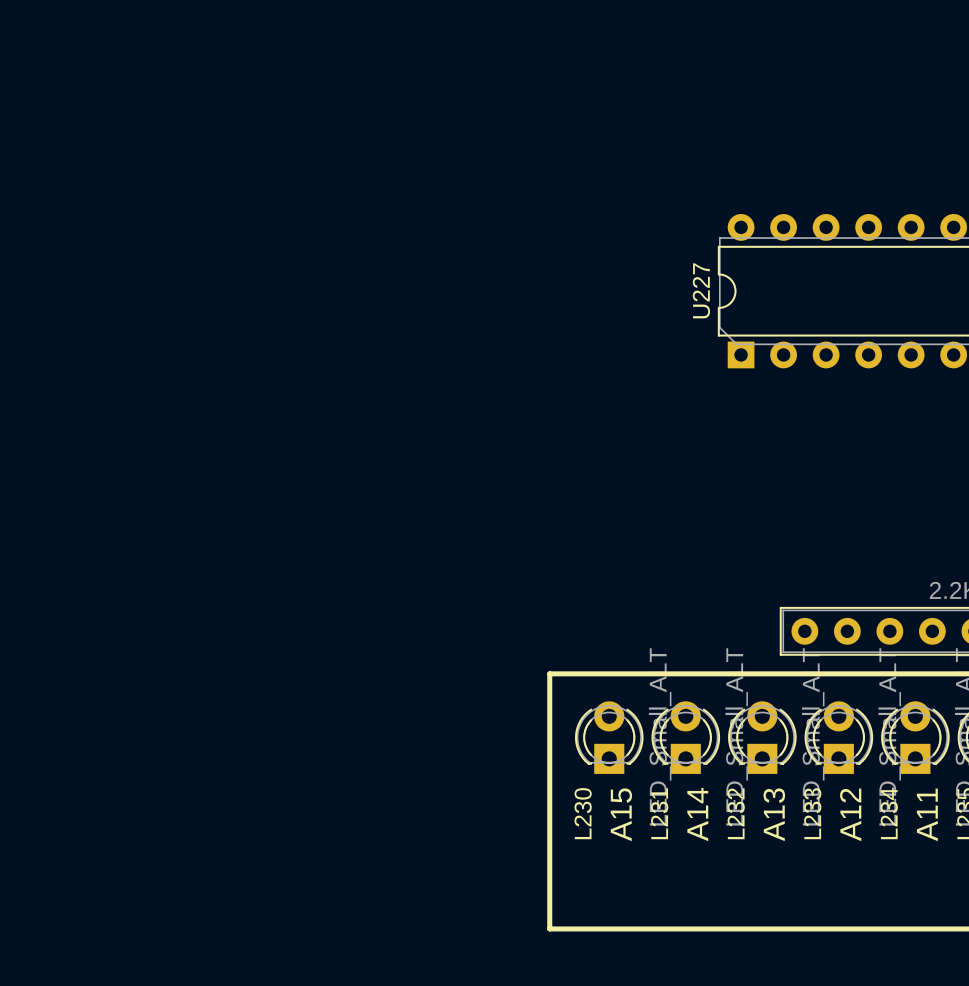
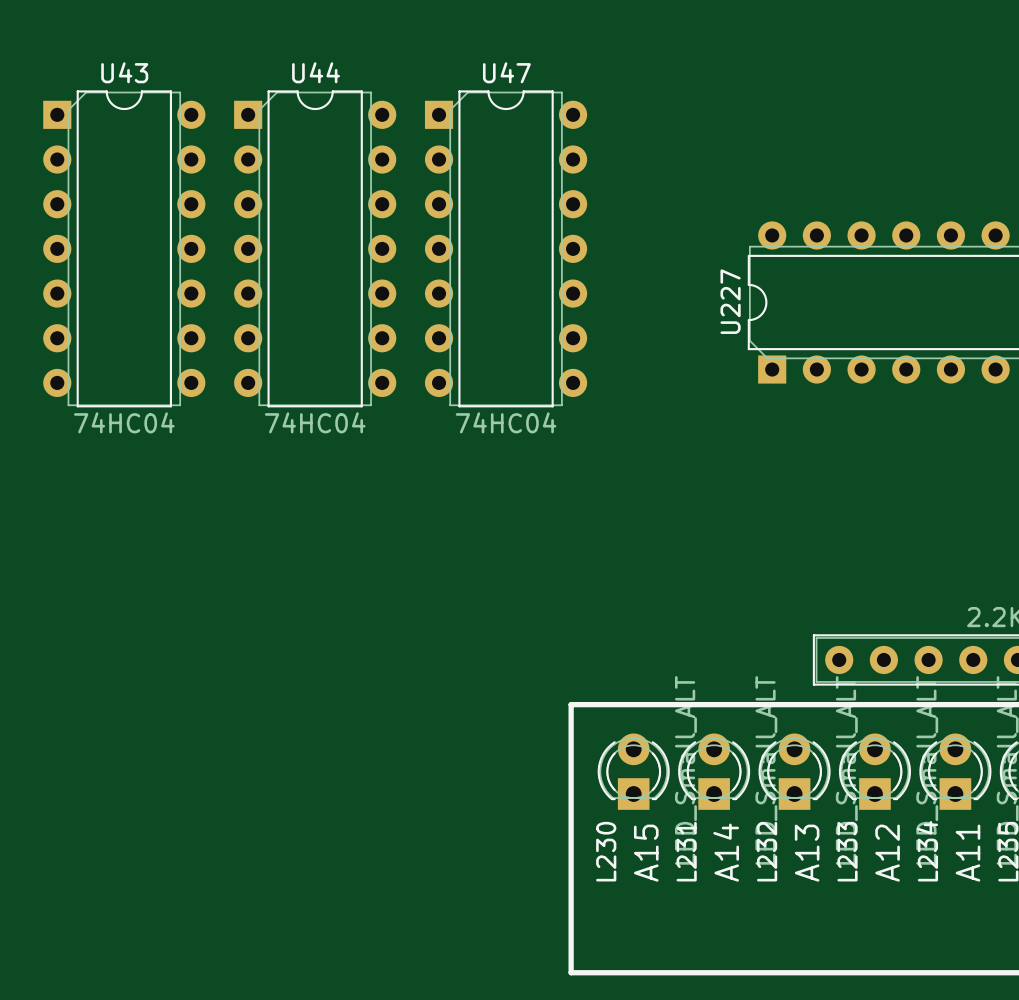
U43: none -> 74HC04 (124, 248)
U44: none -> 74HC04 (315, 248)
U47: none -> 74HC04 (506, 248)

